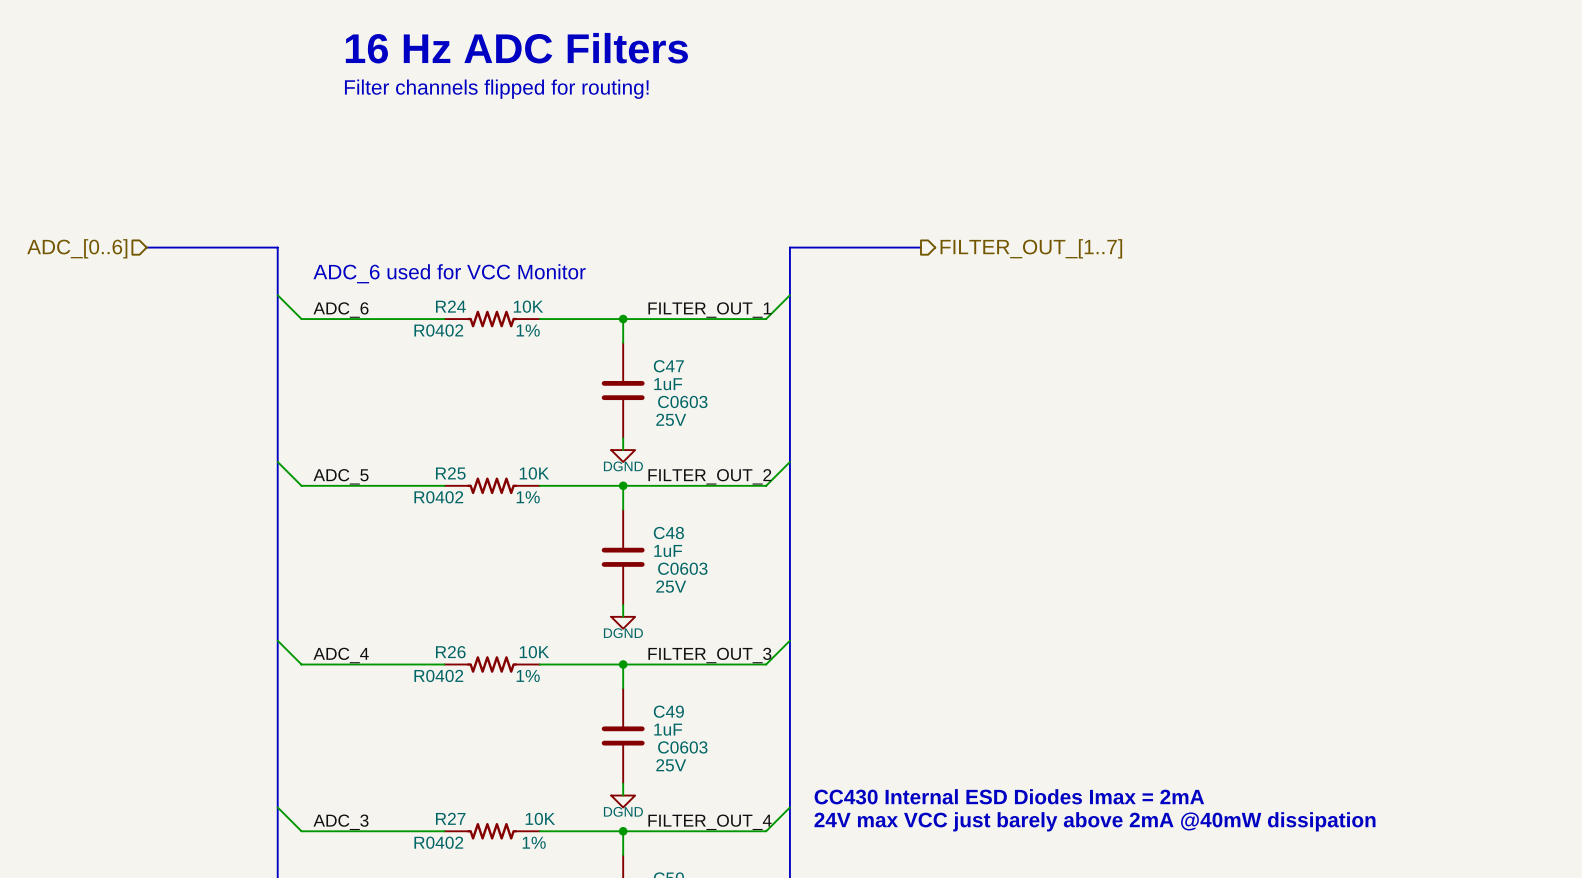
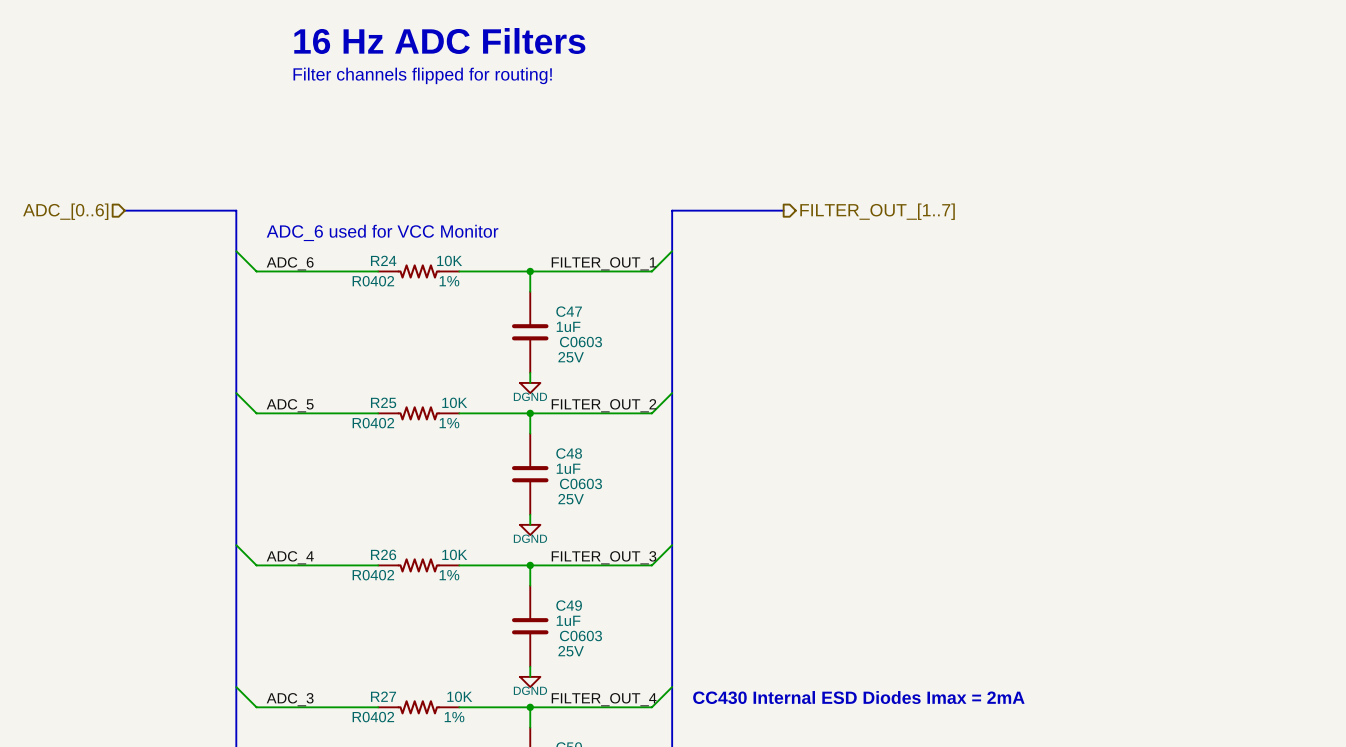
text: CC430 Internal ESD Diodes Imax = 2mA (1009, 796) -> none
text: 24V max VCC just barely above 2mA @40mW dissipation (1094, 821) -> CC430 Internal ESD Diodes Imax = 2mA (858, 697)

